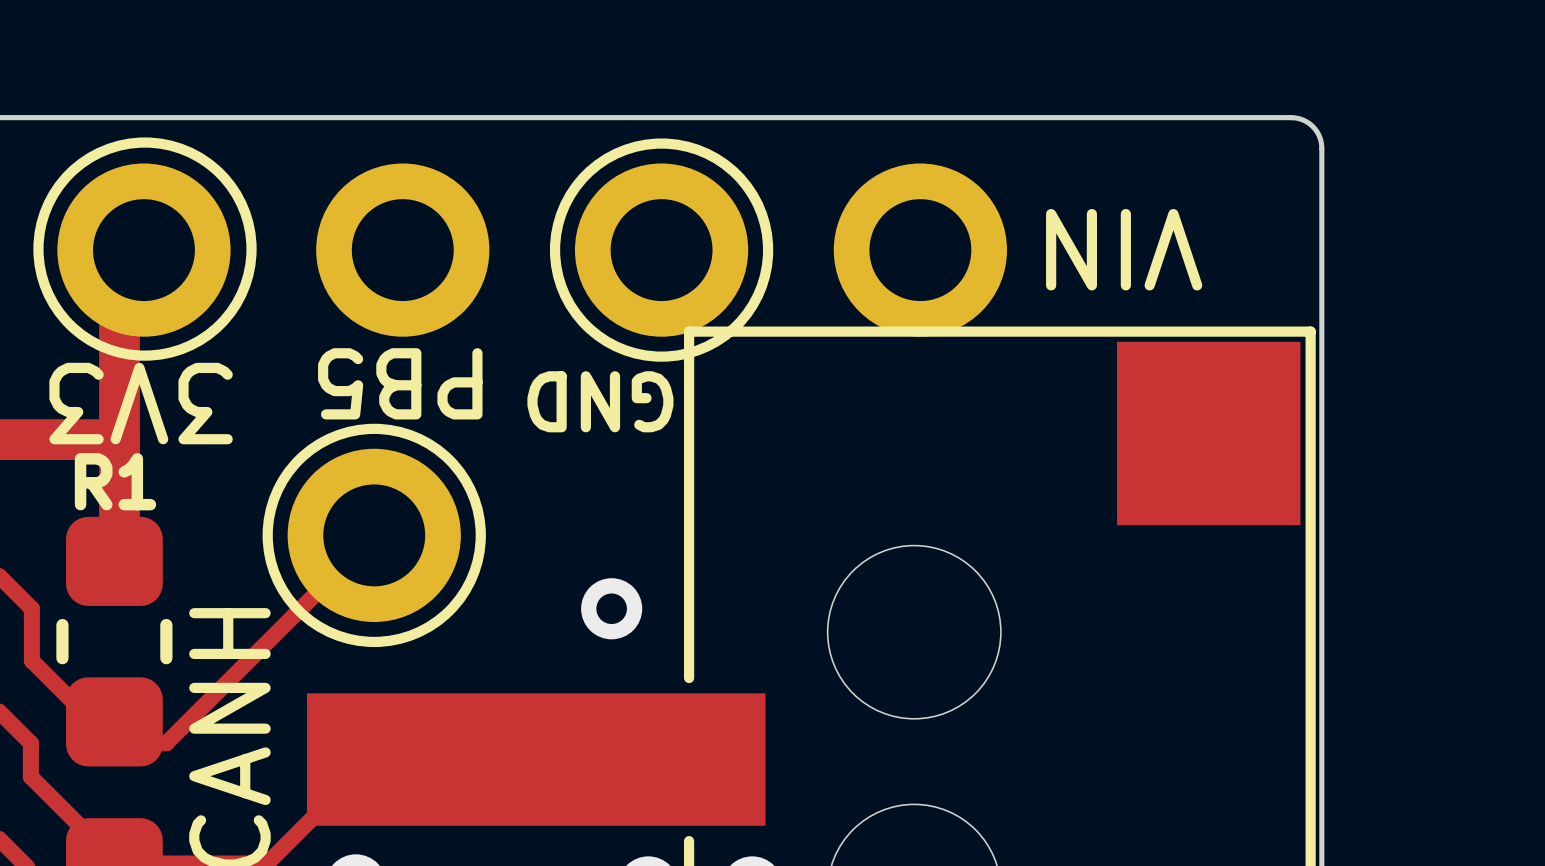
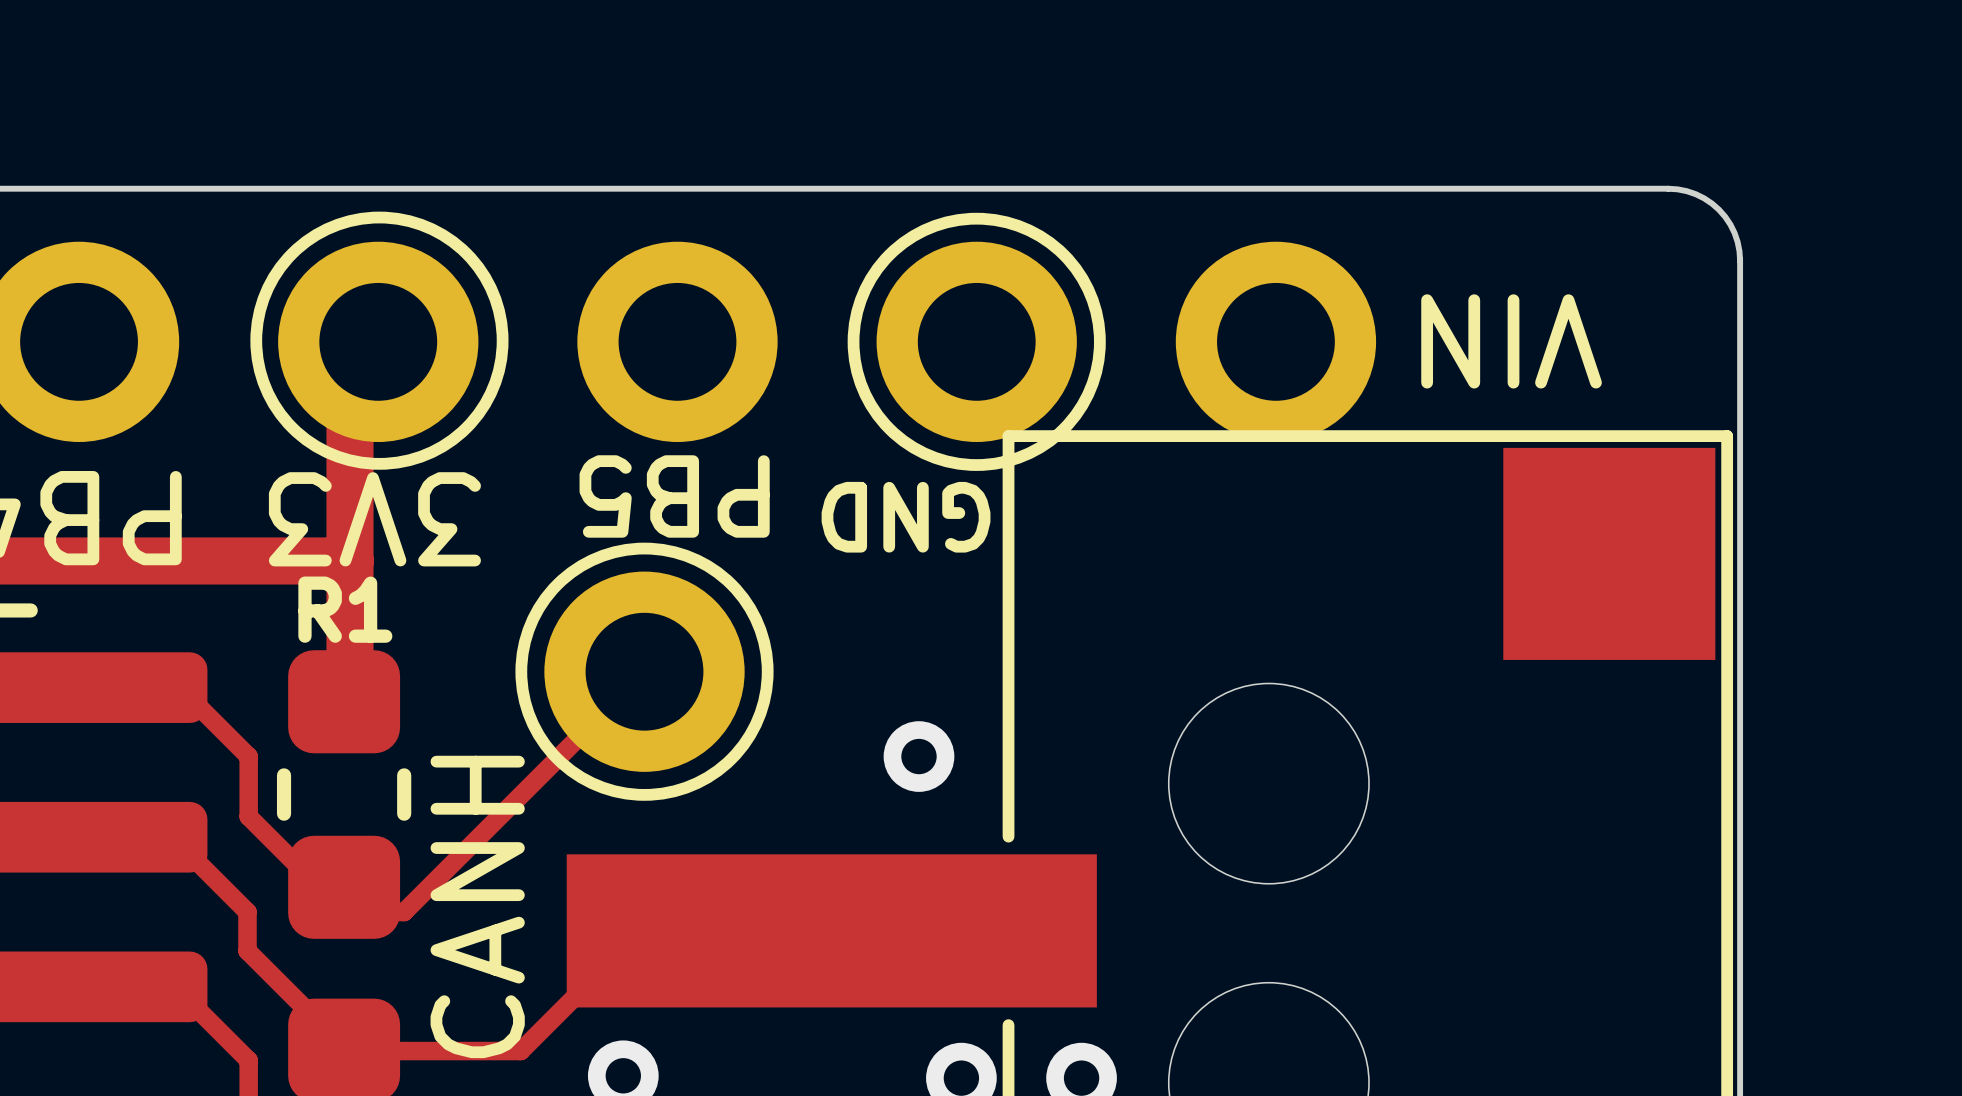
board edge: (1259, 117) (1291, 117) (1302, 119) (1309, 123) (1317, 132) (1321, 148) -> (1668, 188) (1695, 194) (1719, 209) (1734, 233) (1740, 260)
board edge: (1321, 149) (1321, 178) -> none

